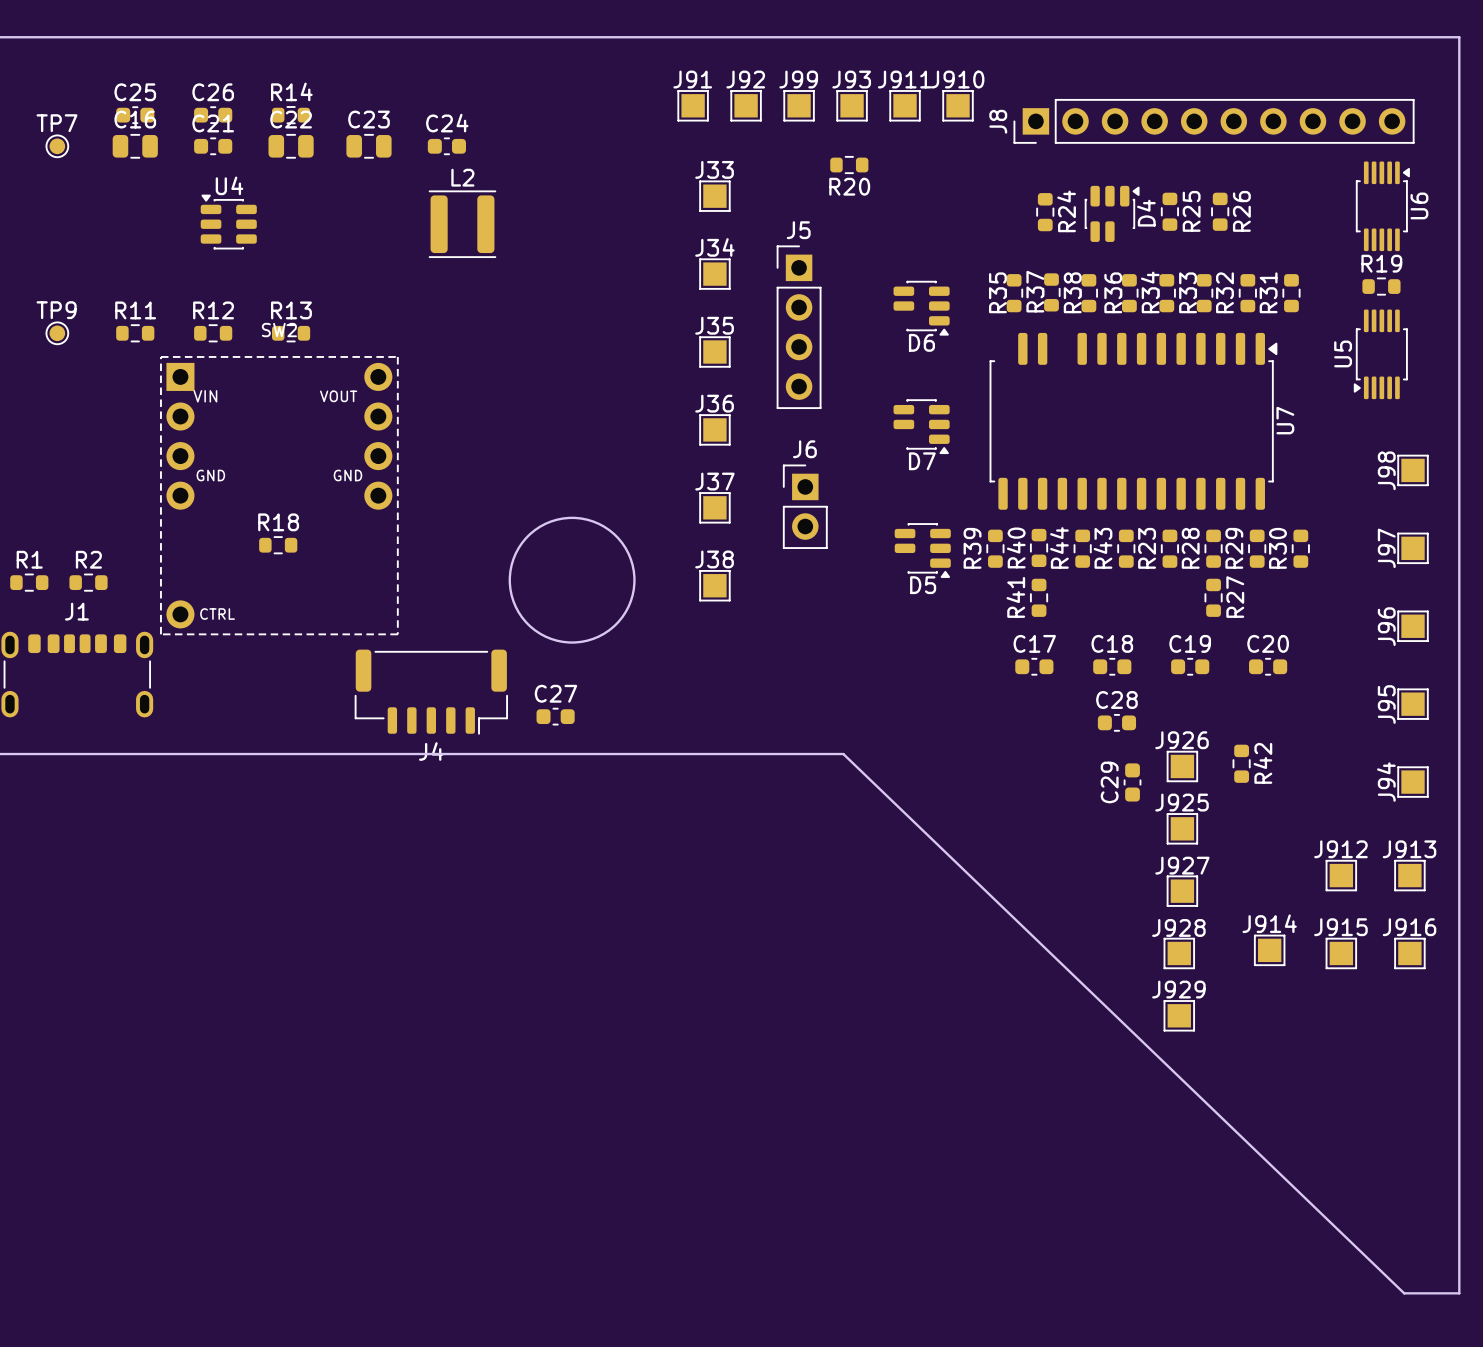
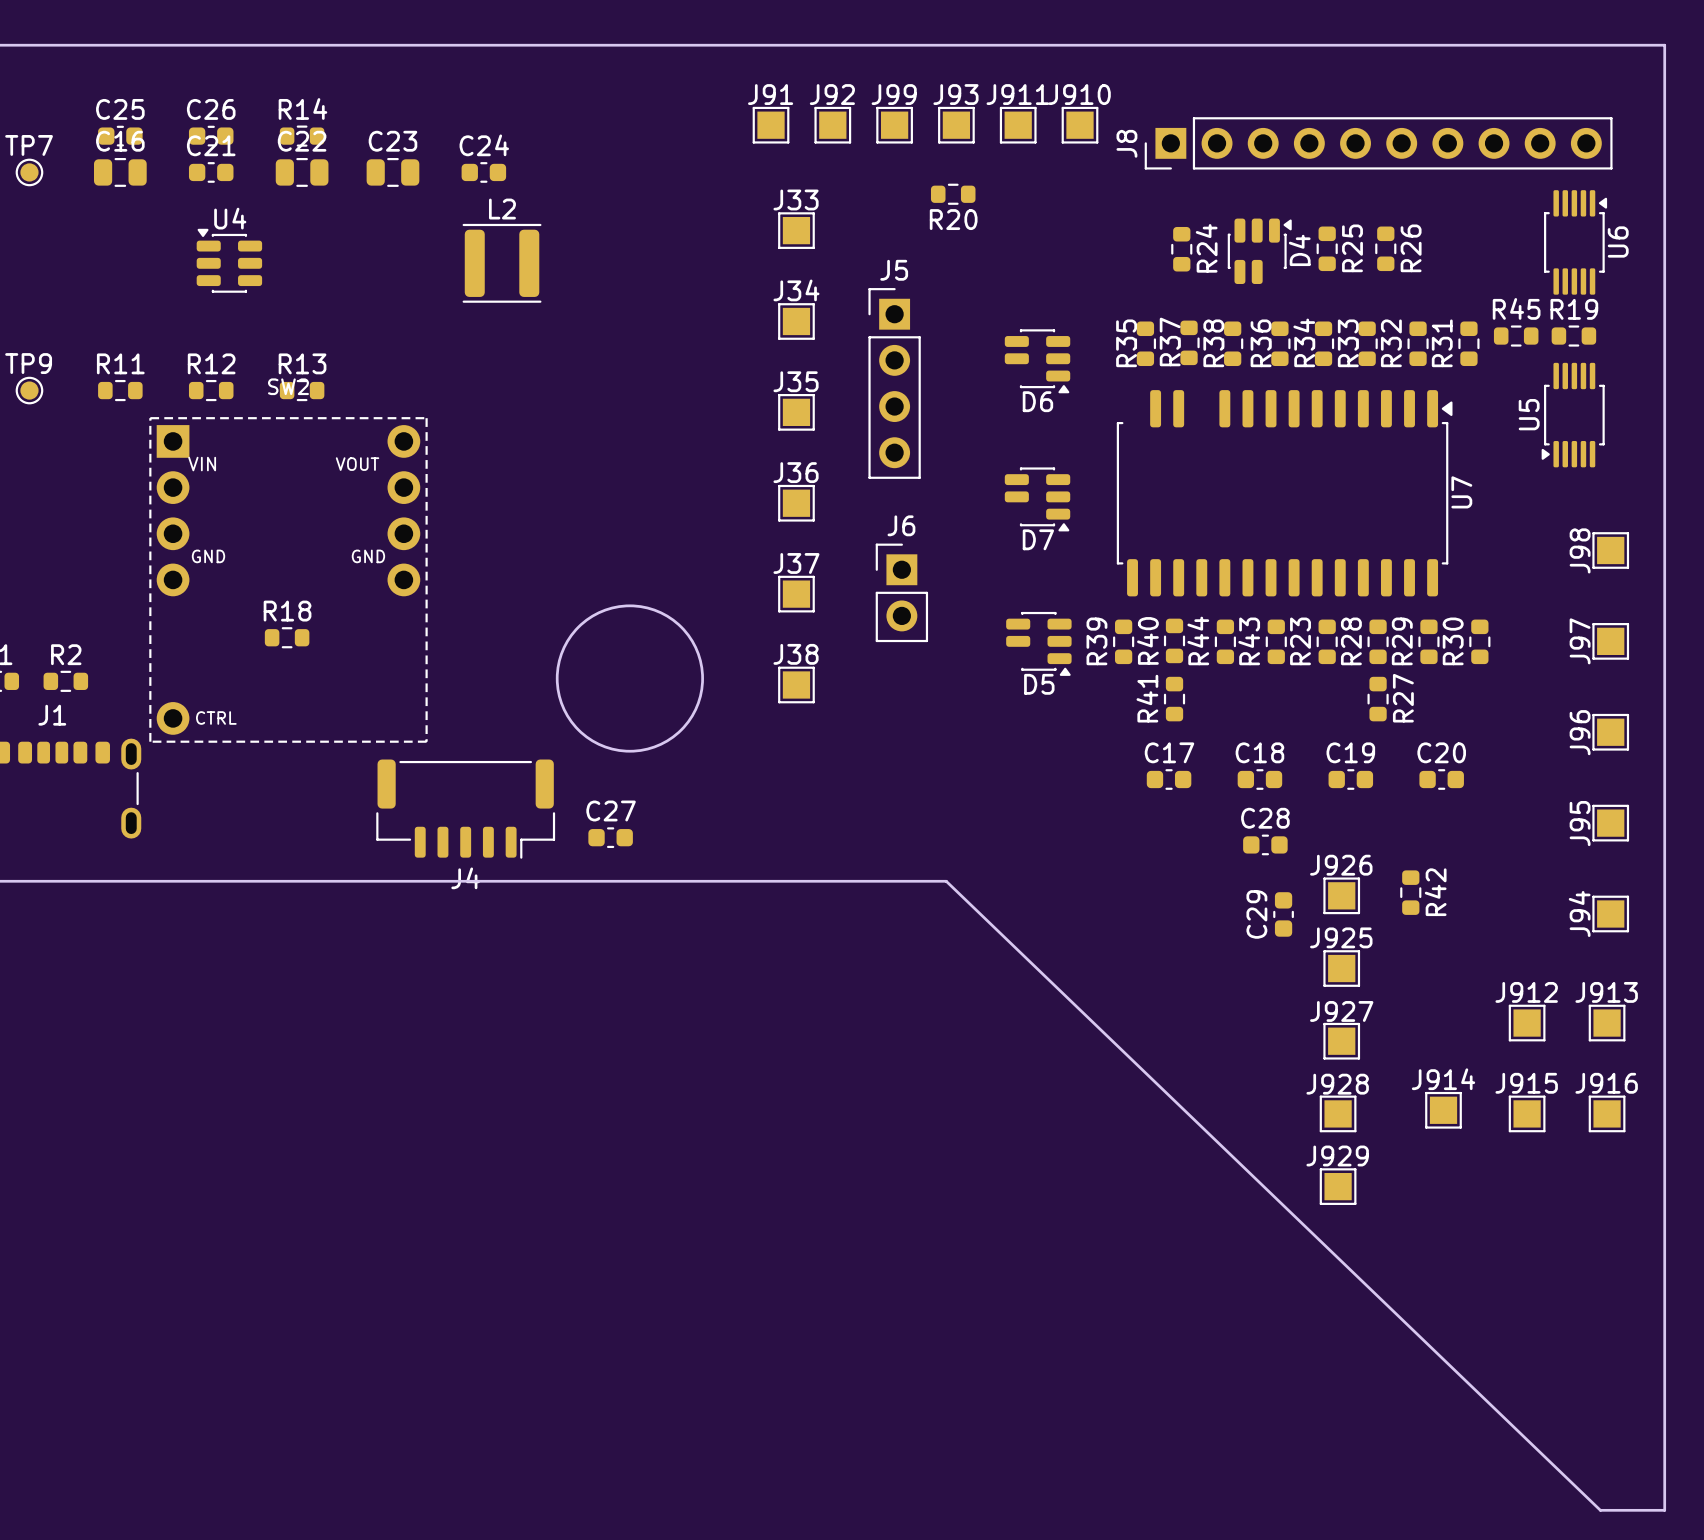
R45: none -> (1516, 336)

